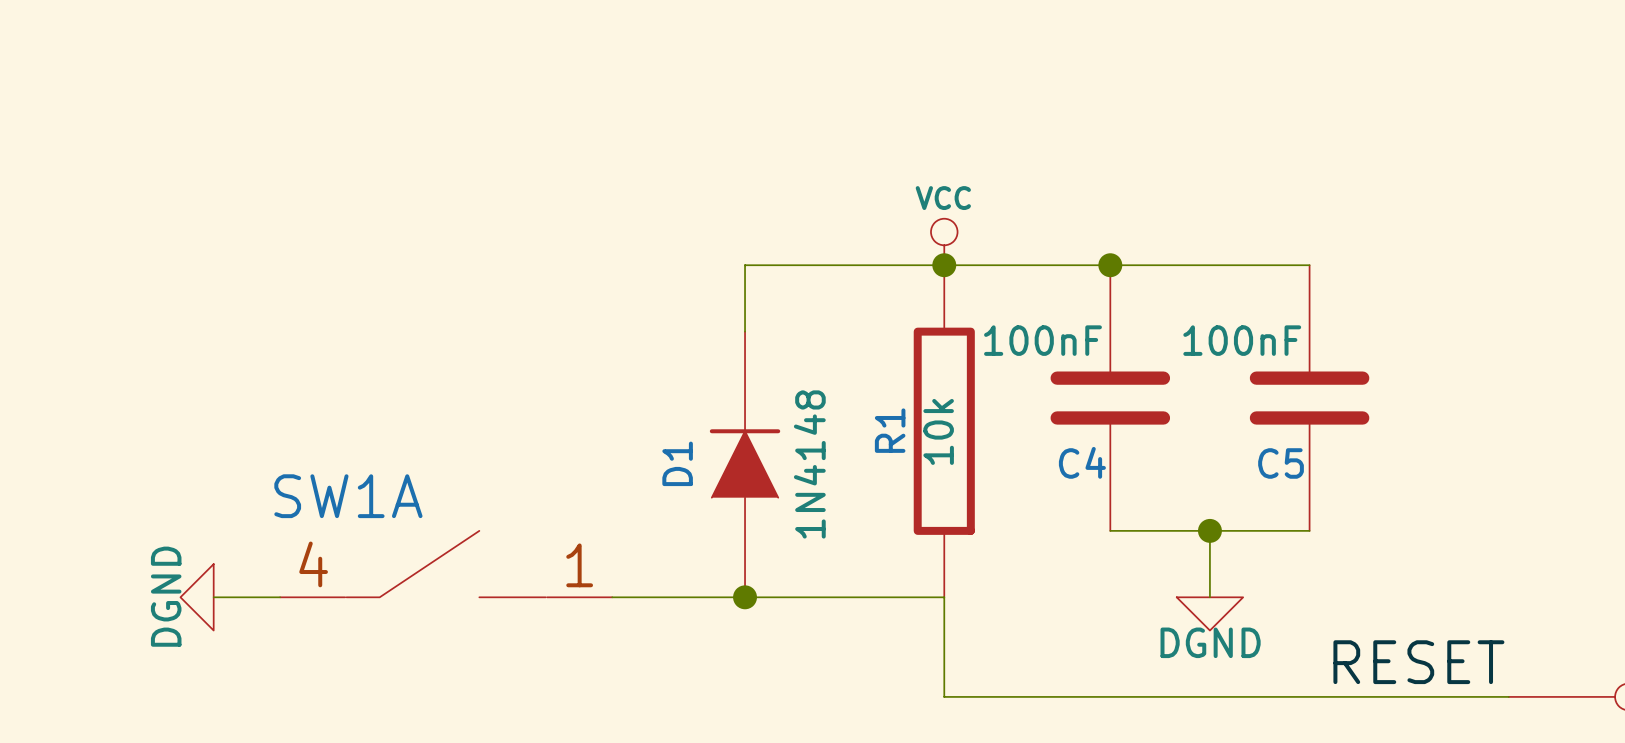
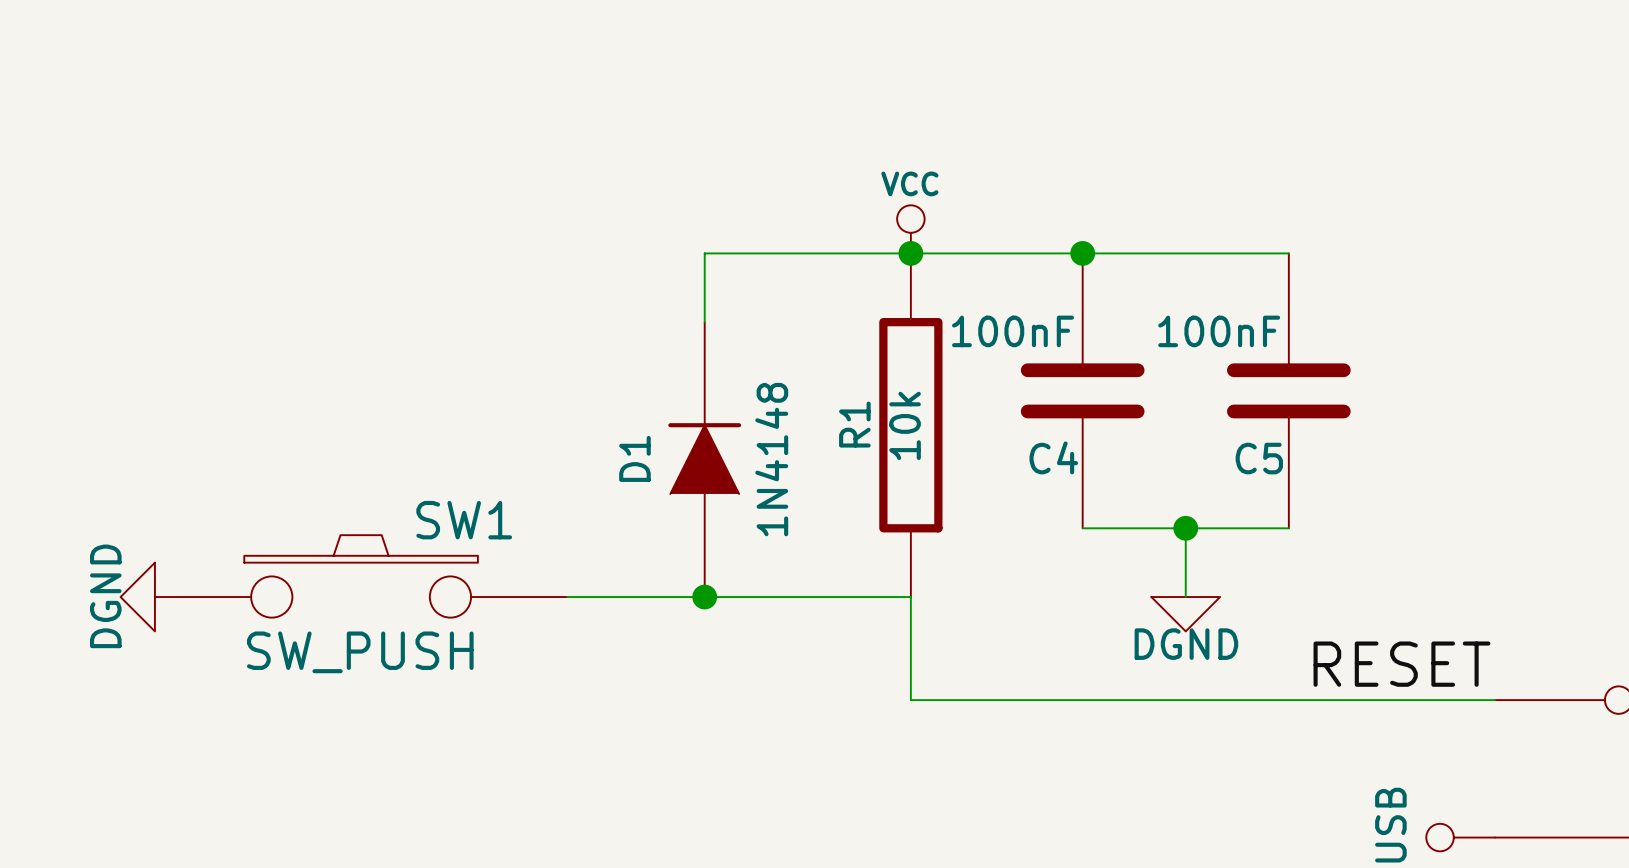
SW1A: (446, 564) -> none
SW1: none -> SW_PUSH (361, 576)

